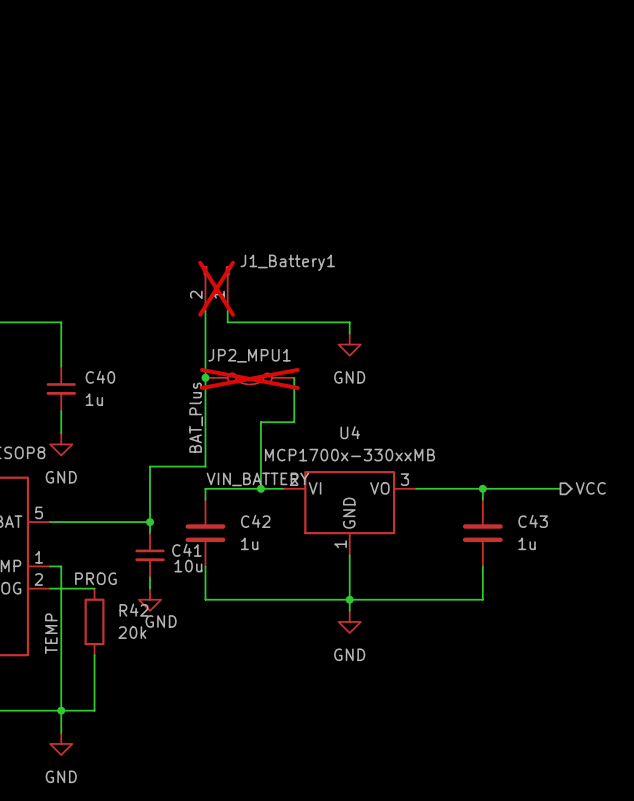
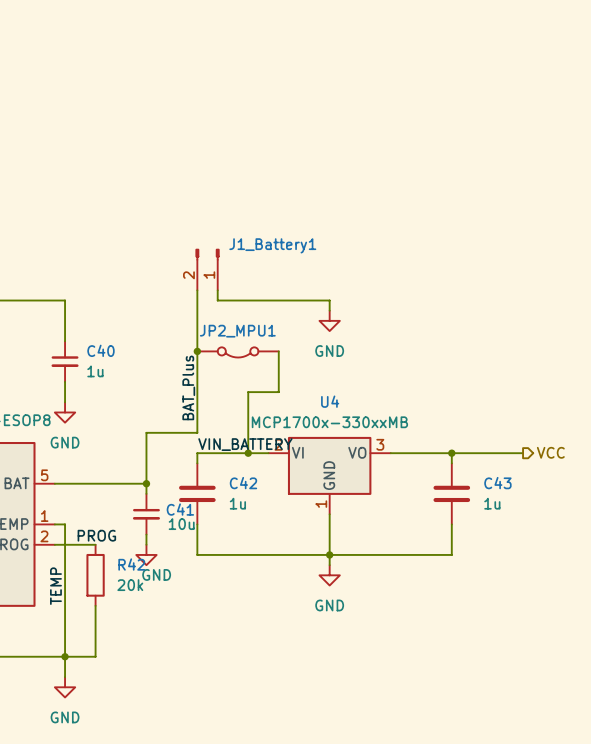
J1_Battery1 do-not-place cross: (216, 288) -> none
JP2_MPU1 do-not-place cross: (249, 378) -> none

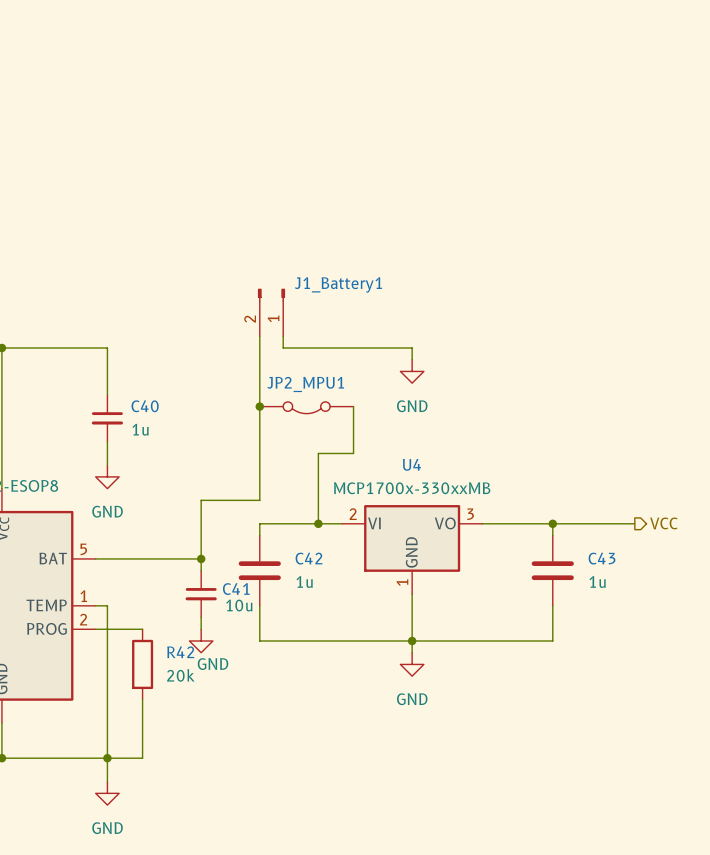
label: BAT_Plus (188, 387) -> none
label: VIN_BATTERY (245, 444) -> none
label: PROG (96, 535) -> none
label: TEMP (55, 586) -> none

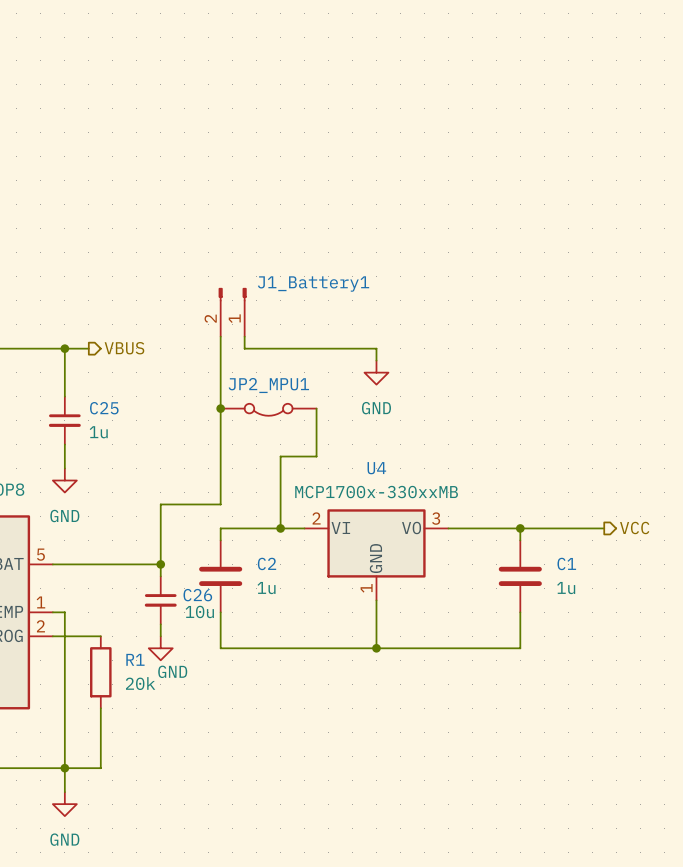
hierarchical label: none -> VBUS (124, 348)
wire: none -> (64, 348) (88, 348)
junction: none -> (64, 348)
C40 name: C40 (145, 406) -> C25 (104, 408)
C42 name: C42 (308, 558) -> C2 (266, 563)
C43 name: C43 (602, 558) -> C1 (566, 563)
C41 name: C41 (236, 589) -> C26 (197, 595)
wire: (412, 641) (412, 652) -> none
R42 name: R42 (180, 652) -> R1 (135, 659)
power symbol: GND (412, 664) -> none

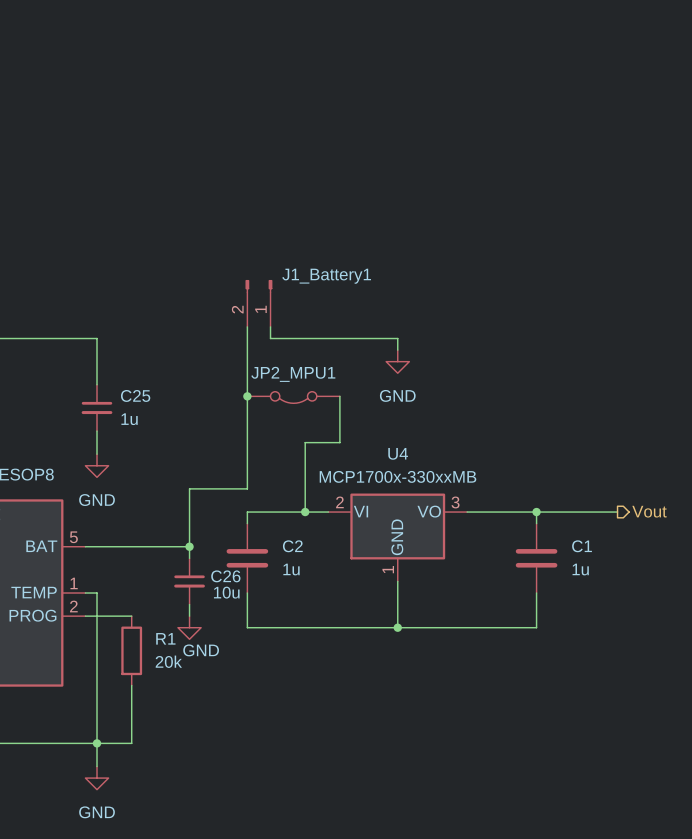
wire: (64, 348) (88, 348) -> none
junction: (64, 348) -> none
hierarchical label: VBUS (124, 348) -> none
hierarchical label: VCC (634, 528) -> Vout (649, 511)

